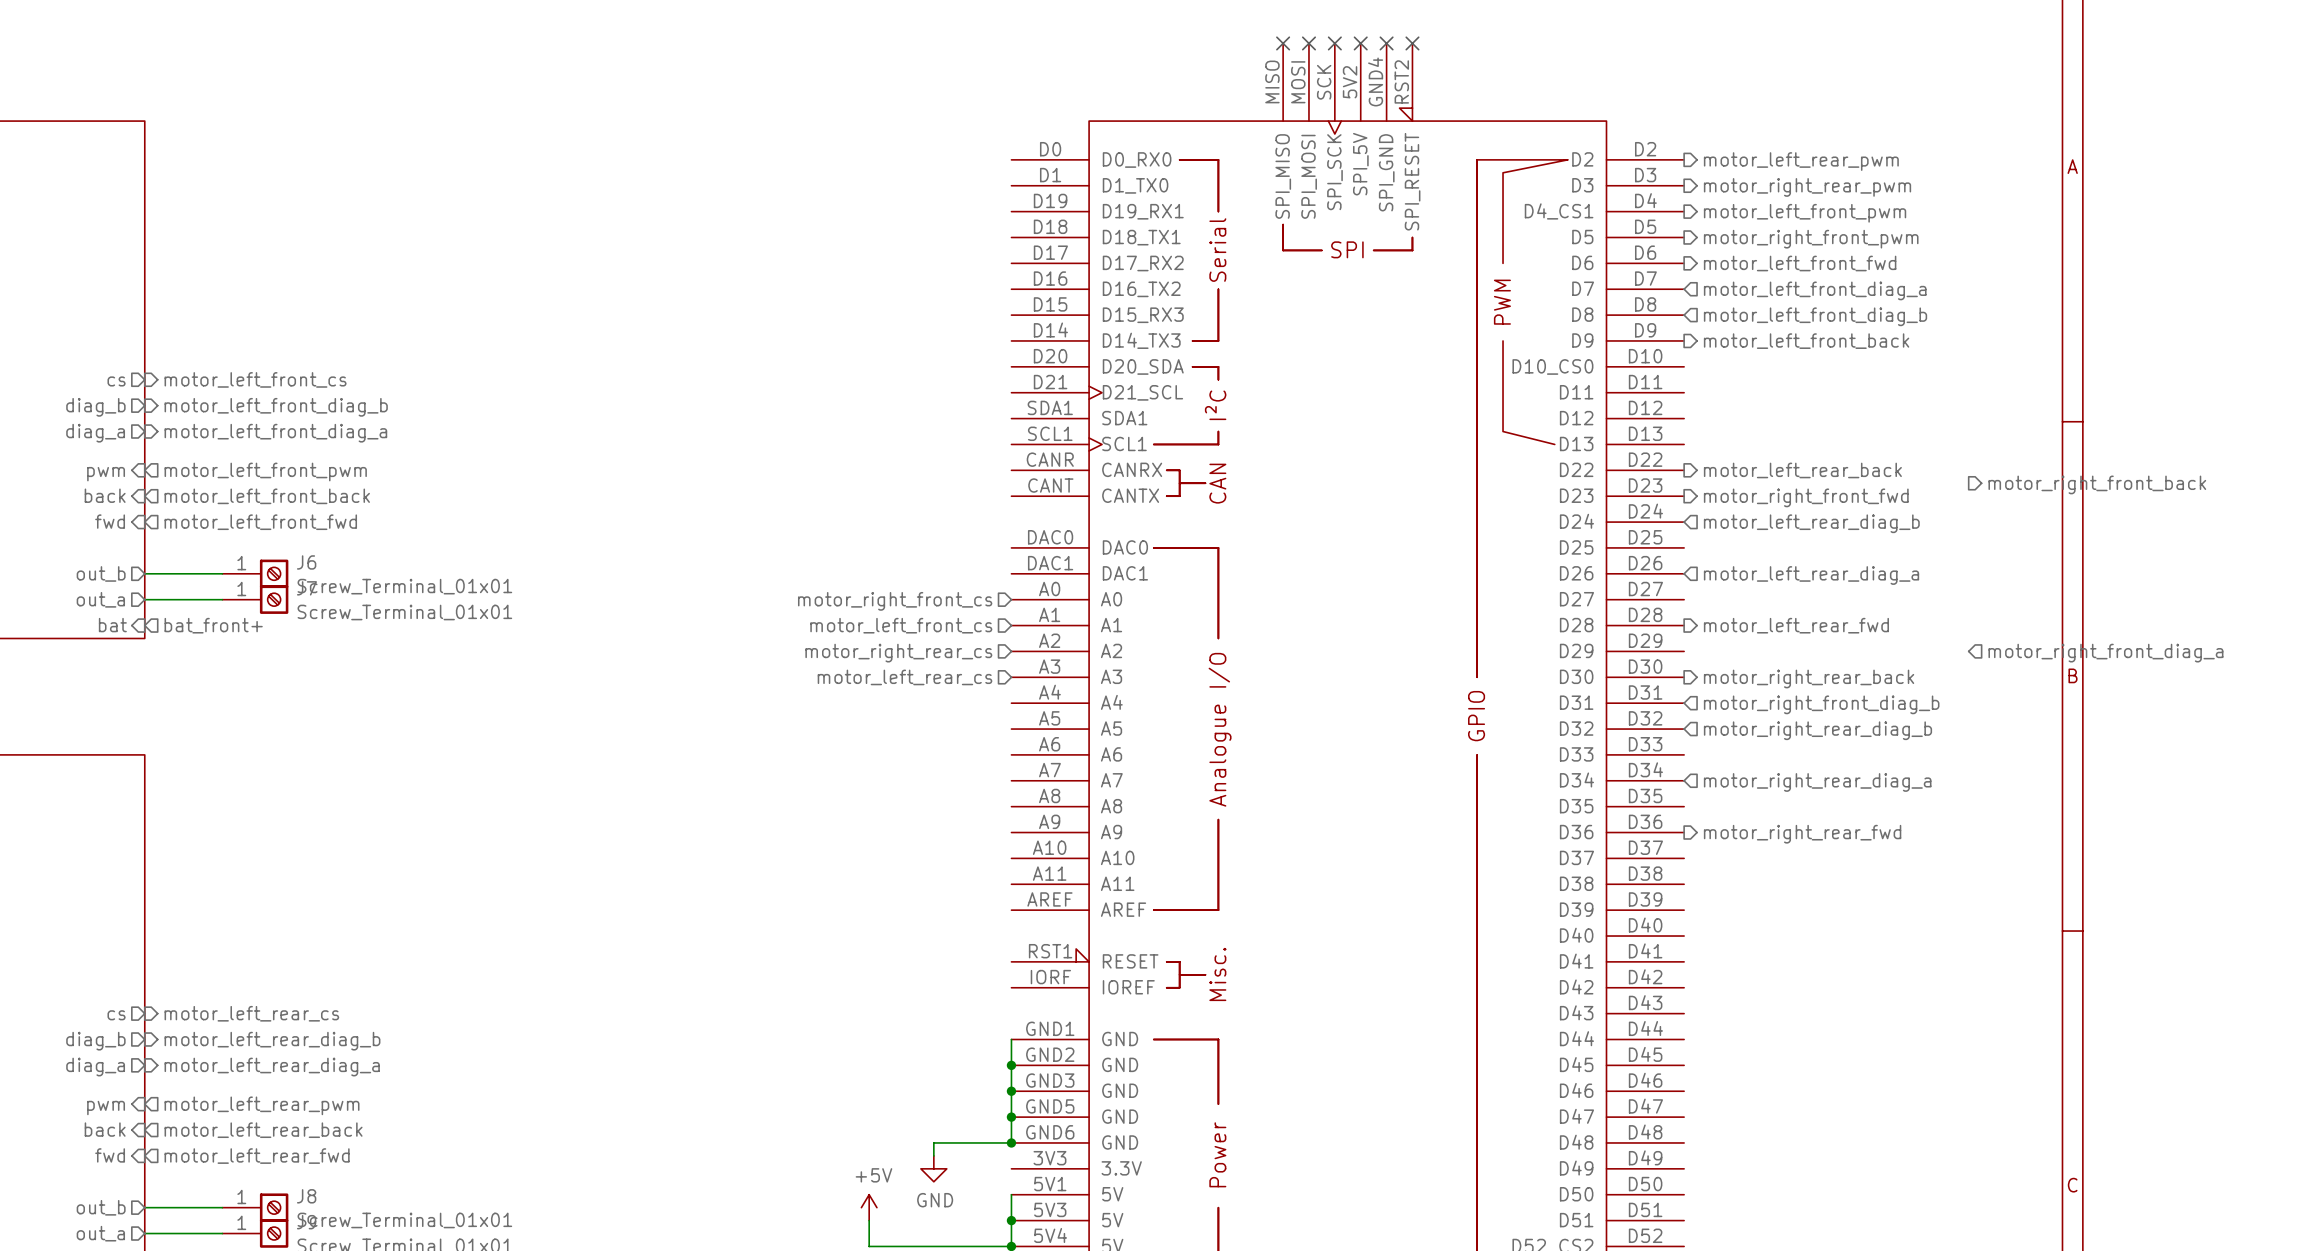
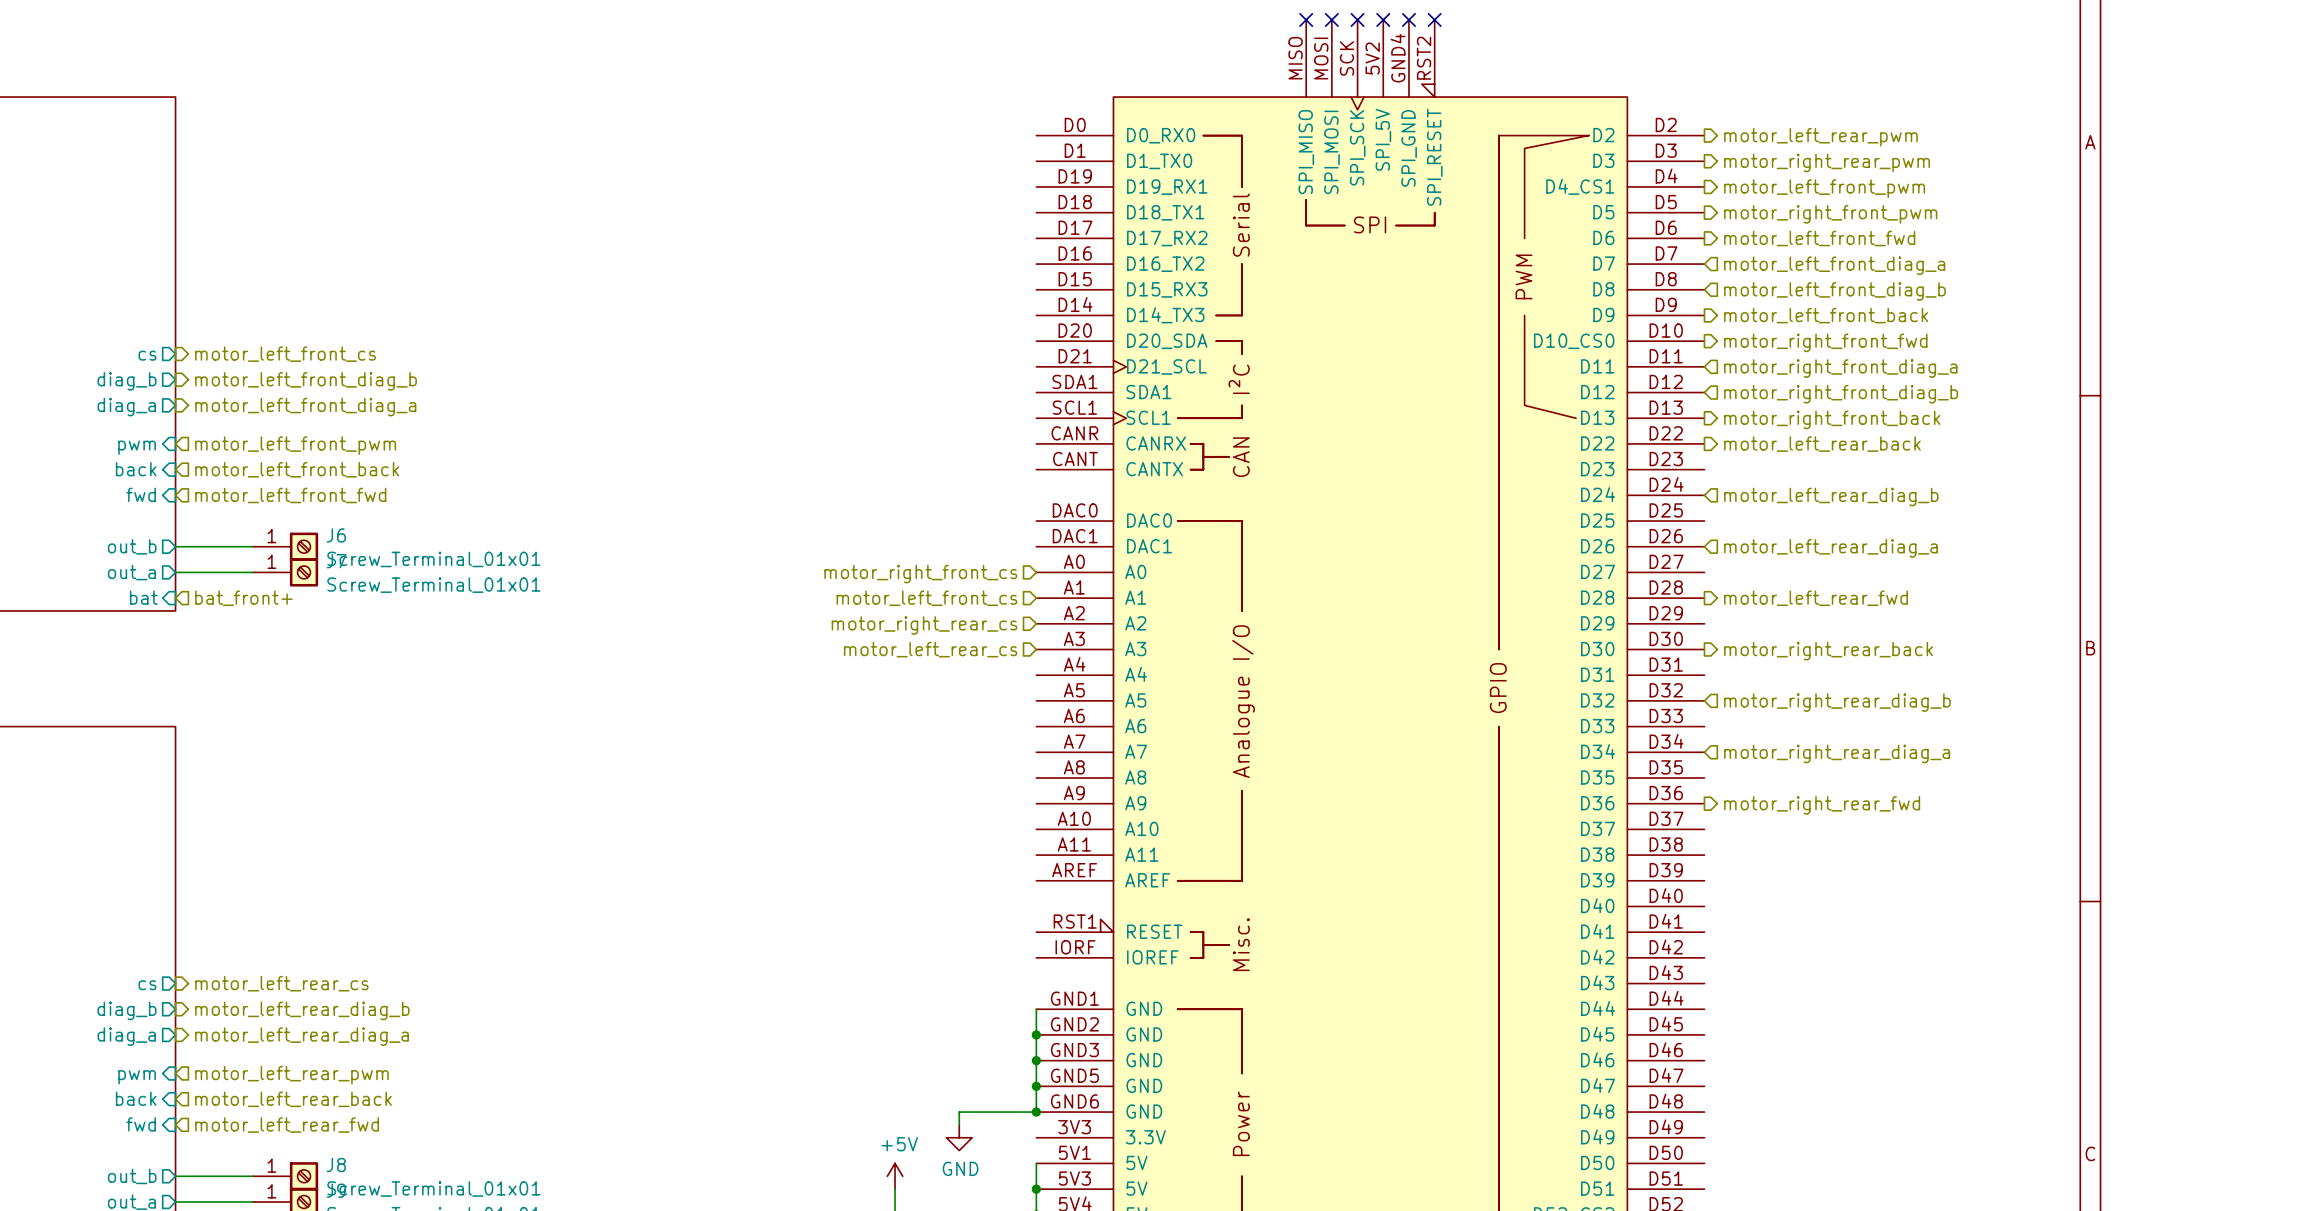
hierarchical label: none -> motor_right_front_diag_a (1840, 368)
hierarchical label: none -> motor_right_front_diag_b (1841, 394)
hierarchical label: none -> motor_right_front_back (1832, 419)
hierarchical label: motor_right_front_back (2097, 484) -> none
hierarchical label position: motor_right_front_fwd (1806, 497) -> motor_right_front_fwd (1825, 342)
hierarchical label: motor_right_front_diag_a (2105, 653) -> none
hierarchical label: motor_right_front_diag_b (1821, 704) -> none

